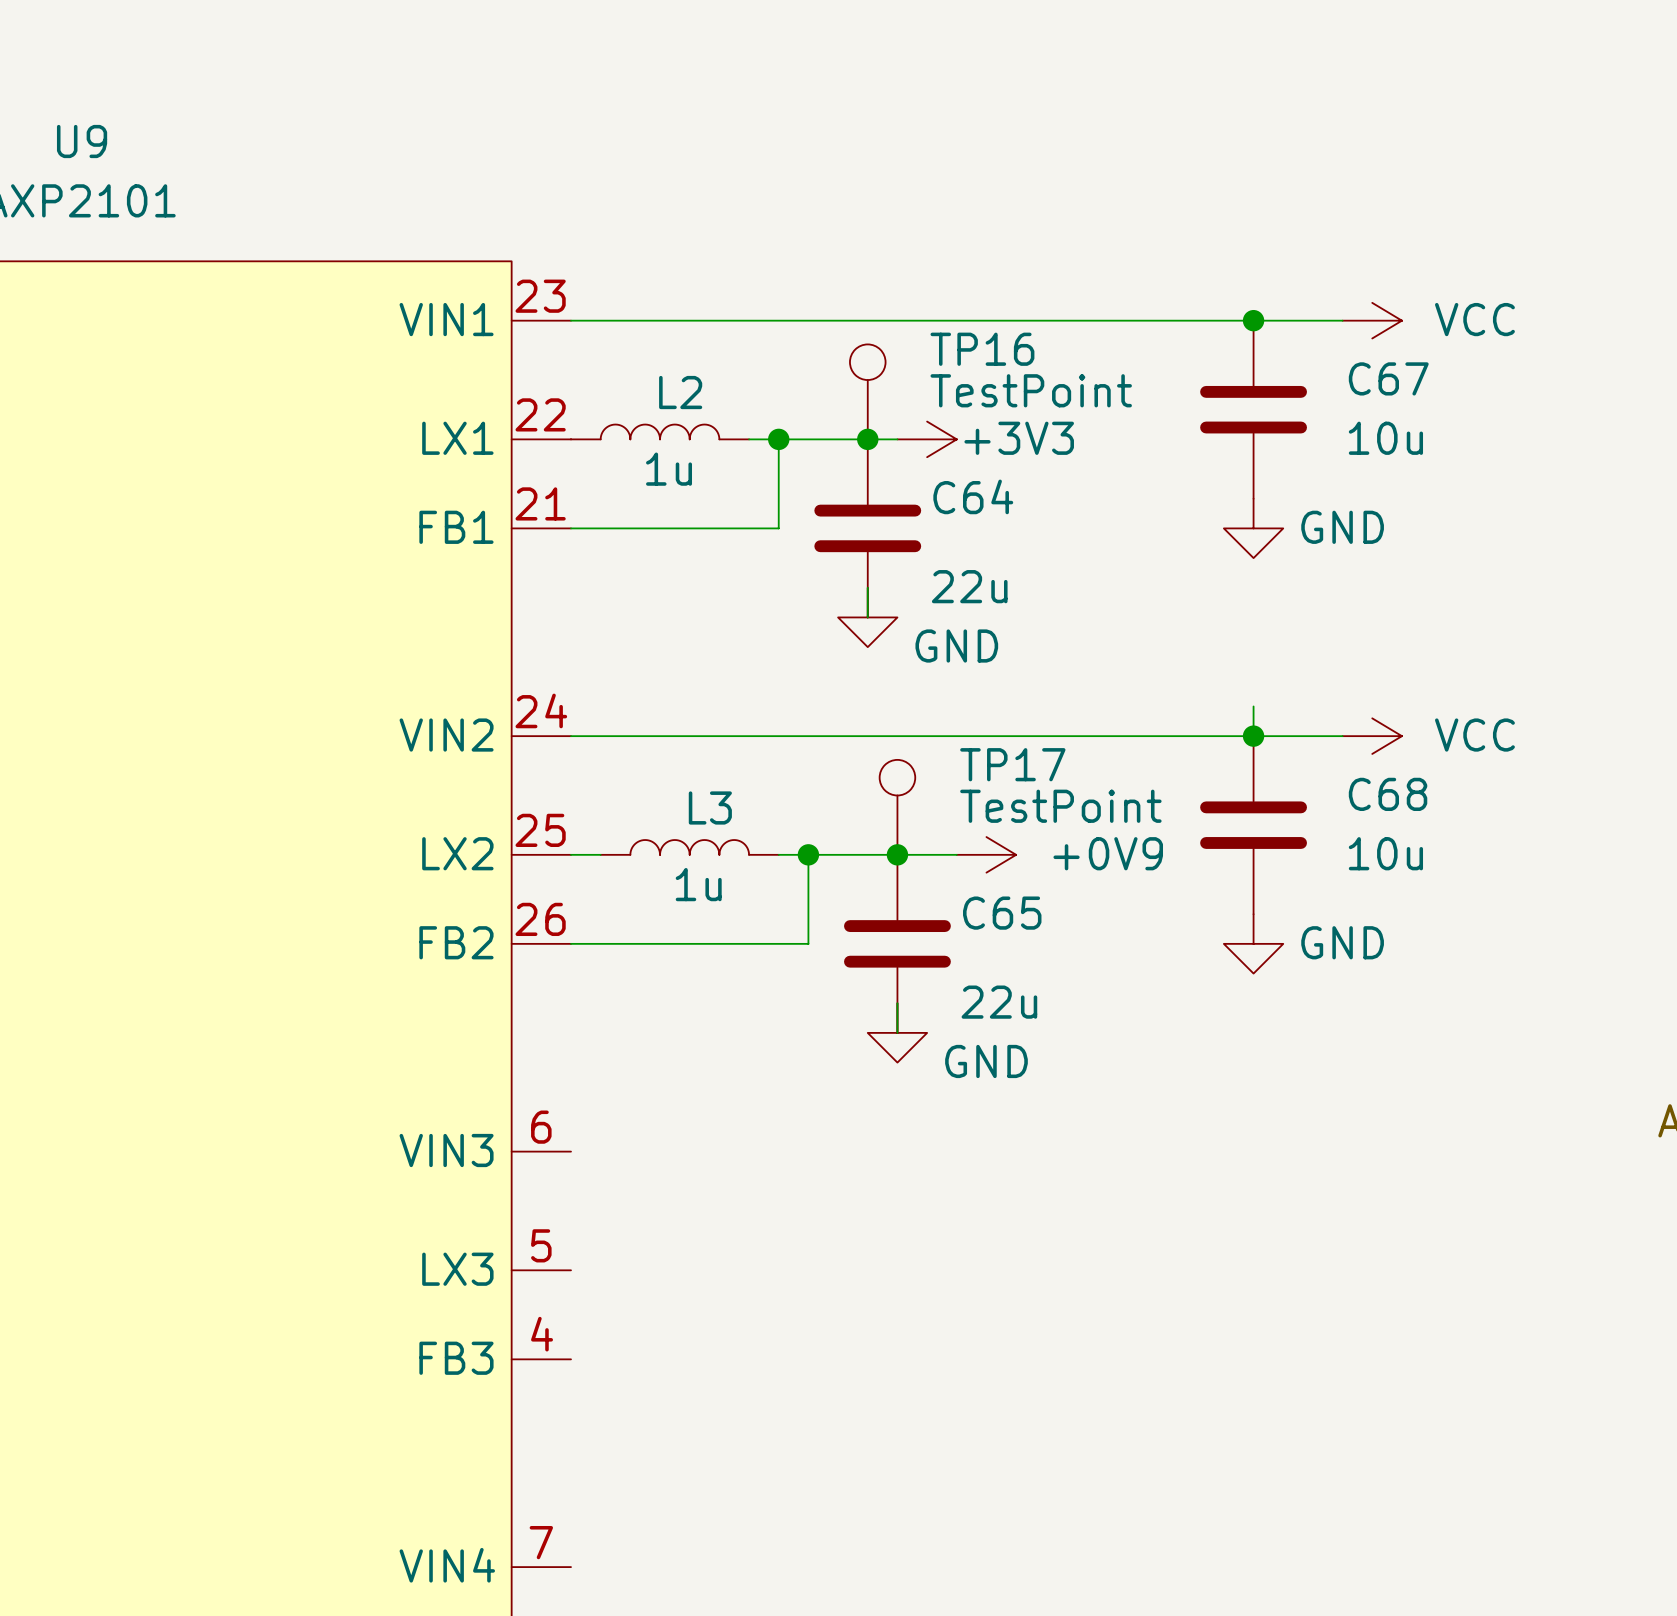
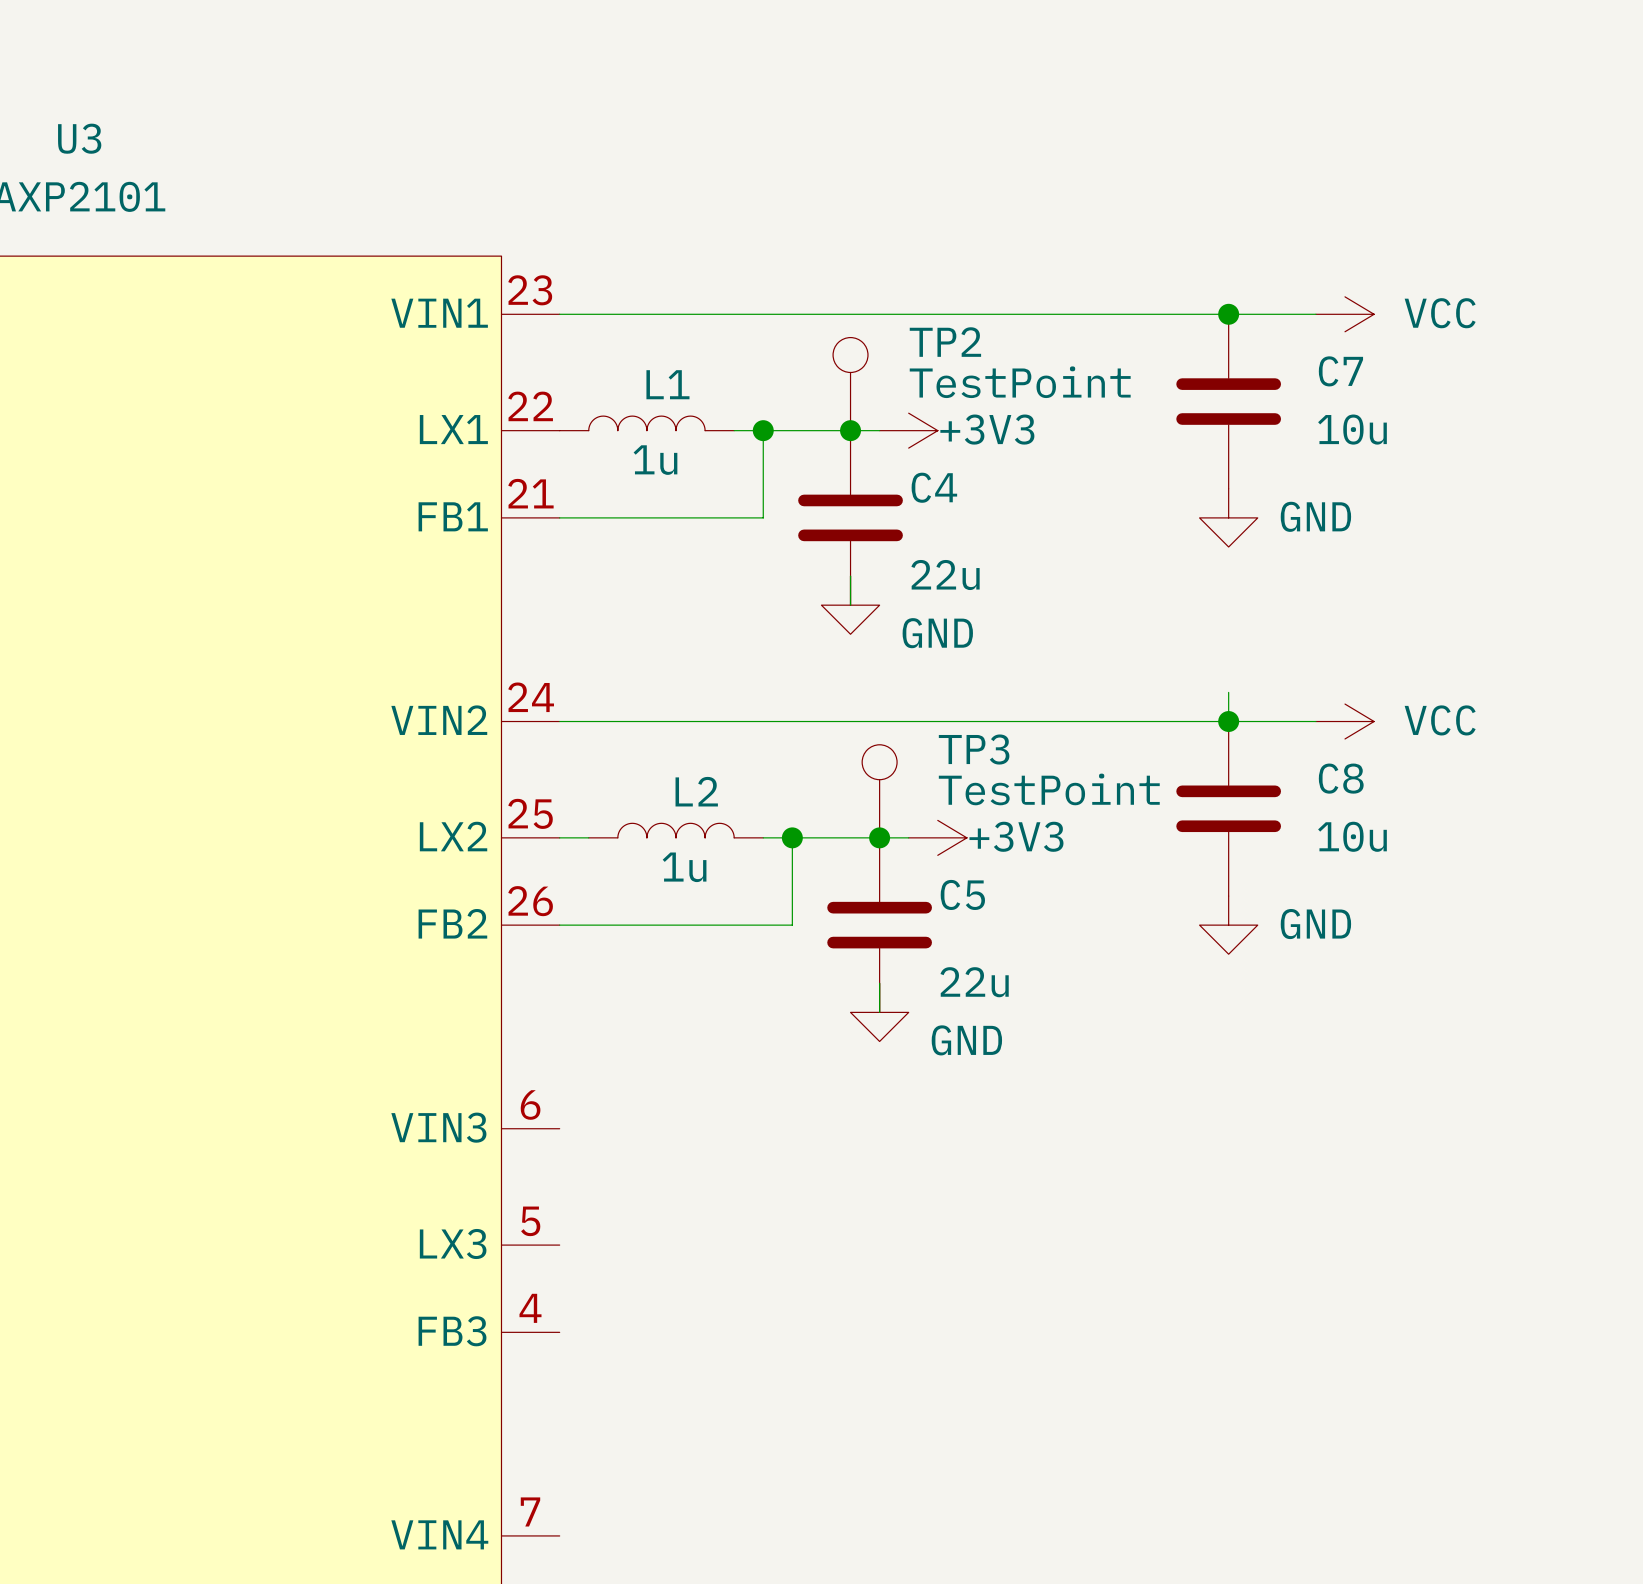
U9 name: U9 (82, 141) -> U3 (79, 138)
TP16 name: TP16 (982, 349) -> TP2 (945, 342)
C67 name: C67 (1388, 378) -> C7 (1340, 371)
L2 name: L2 (680, 392) -> L1 (667, 384)
C64 name: C64 (973, 496) -> C4 (934, 487)
TP17 name: TP17 (1012, 764) -> TP3 (974, 749)
C68 name: C68 (1388, 794) -> C8 (1341, 778)
L3 name: L3 (710, 807) -> L2 (696, 791)
power symbol: none -> +3V3 (937, 837)
power symbol: +0V9 (986, 854) -> none
C65 name: C65 (1002, 913) -> C5 (962, 894)

